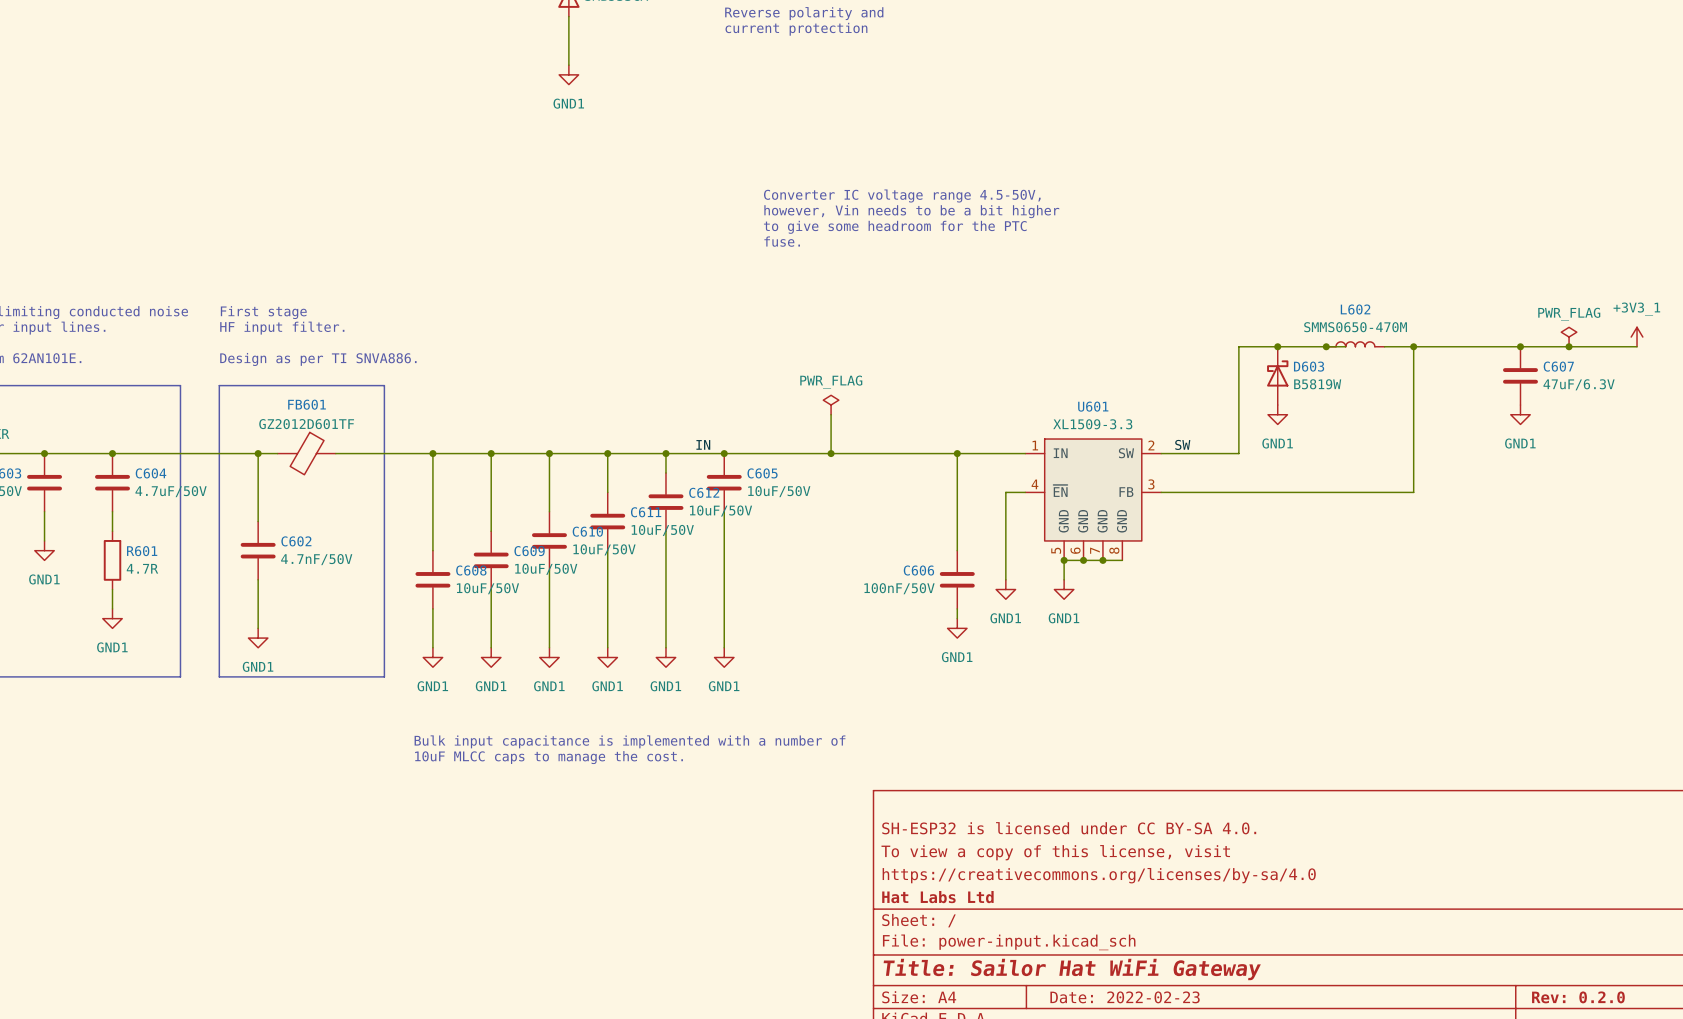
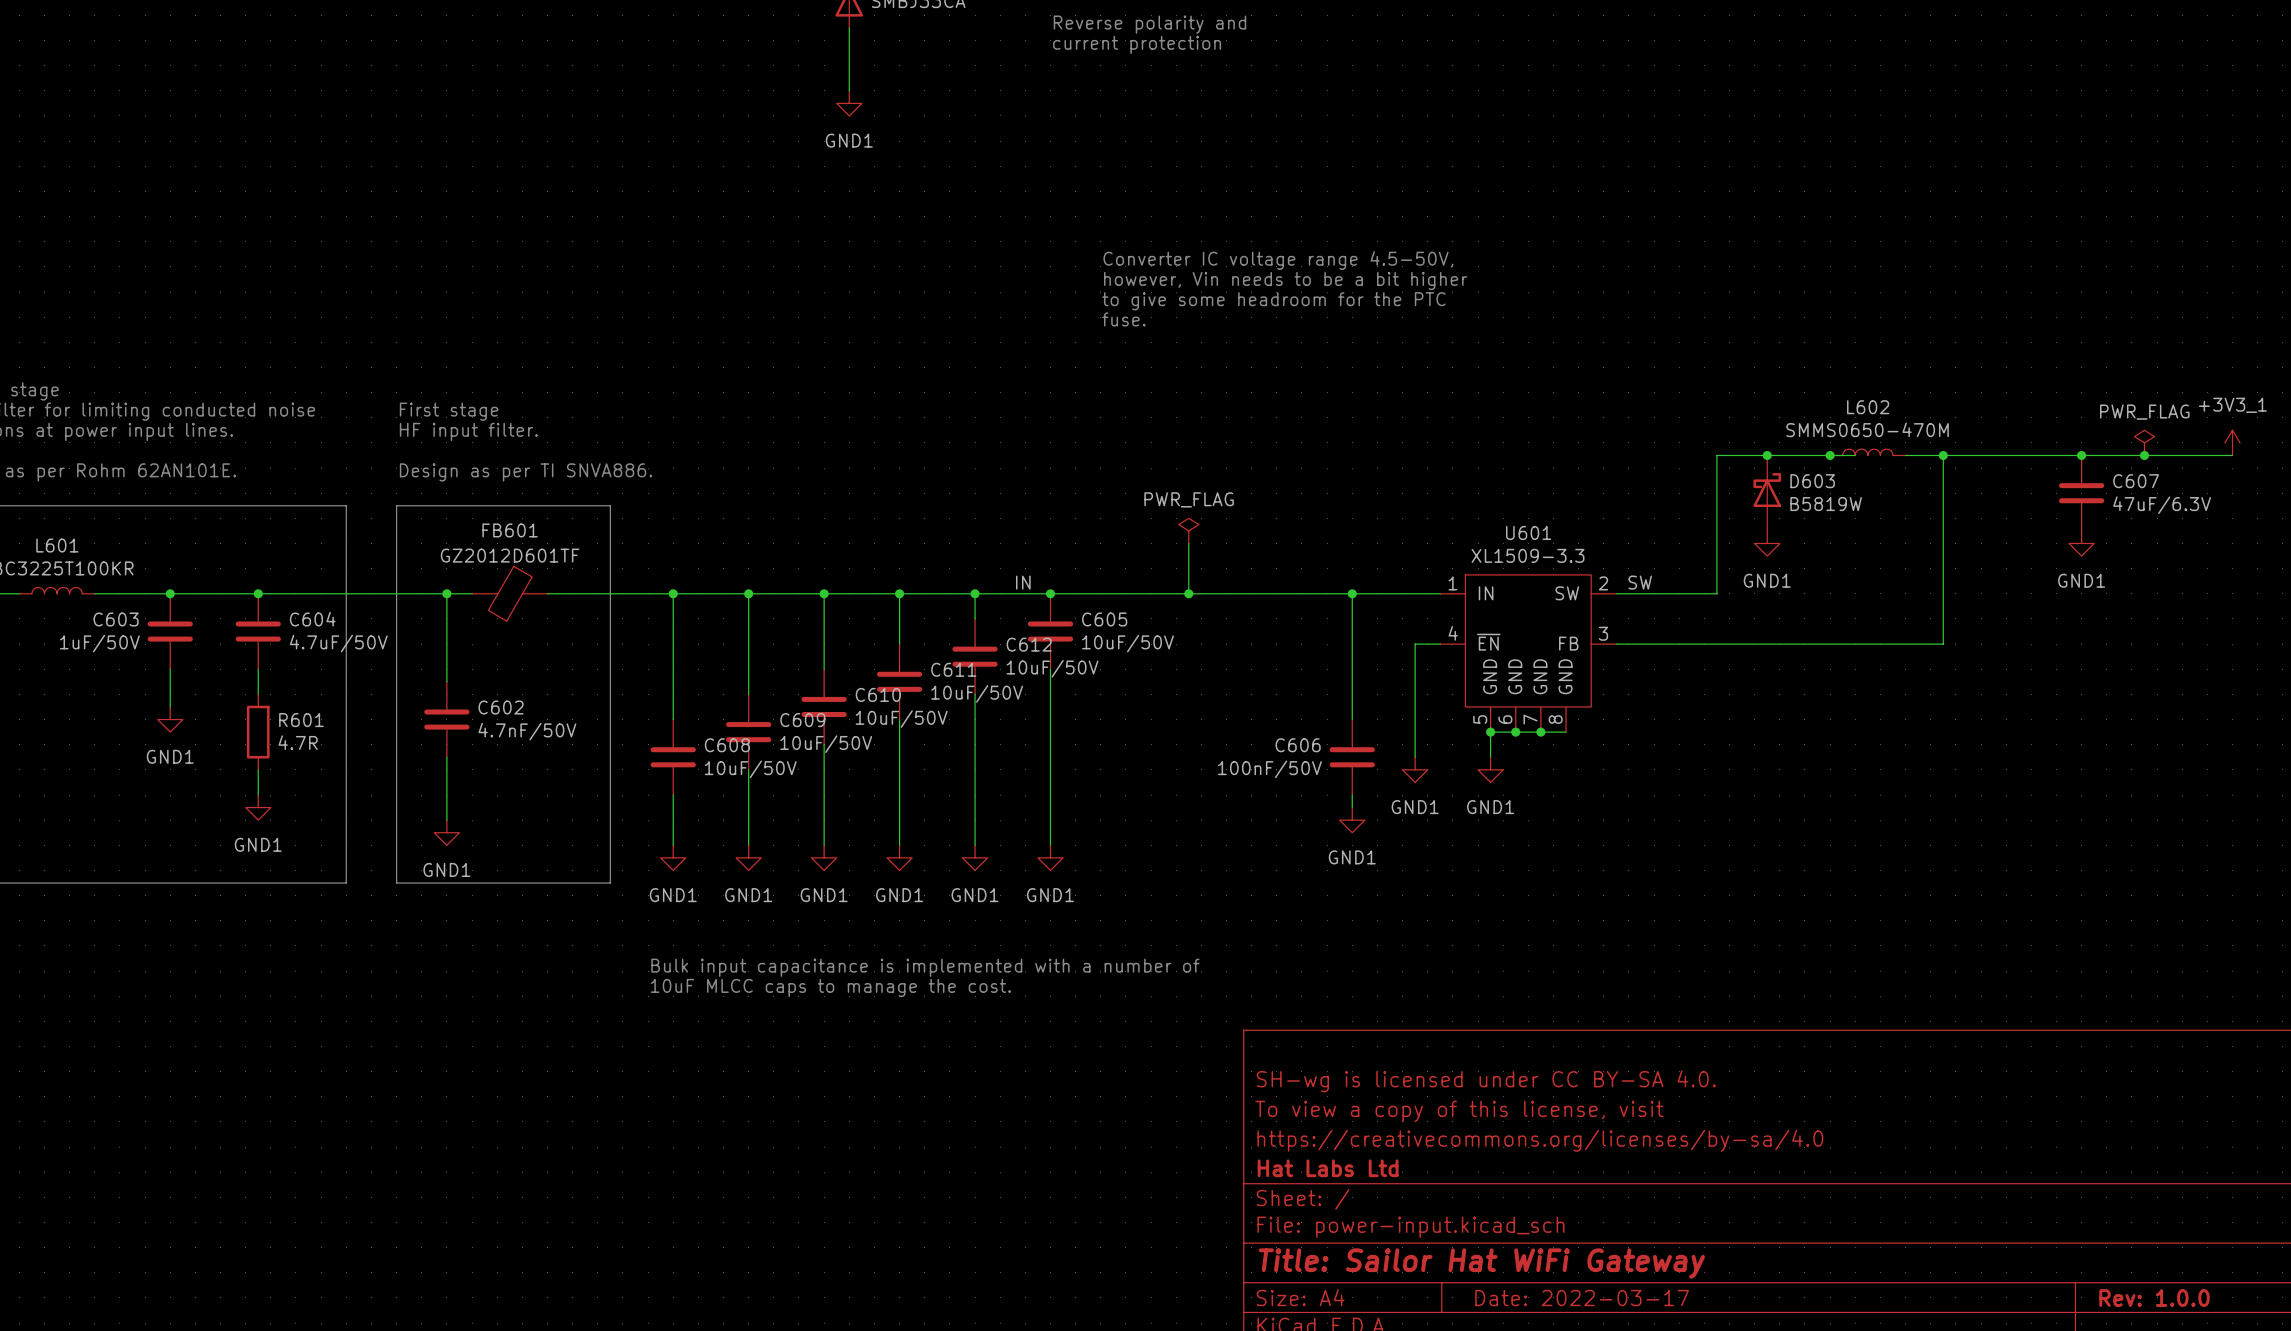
title block: SH-ESP32 is licensed under CC BY-SA 4.0. (1069, 828) -> SH-wg is licensed under CC BY-SA 4.0. (1486, 1081)
title block: Date: 2022-02-23 (1125, 997) -> Date: 2022-03-17 (1582, 1298)
title block: Rev: 0.2.0 (1578, 997) -> Rev: 1.0.0 (2154, 1298)

